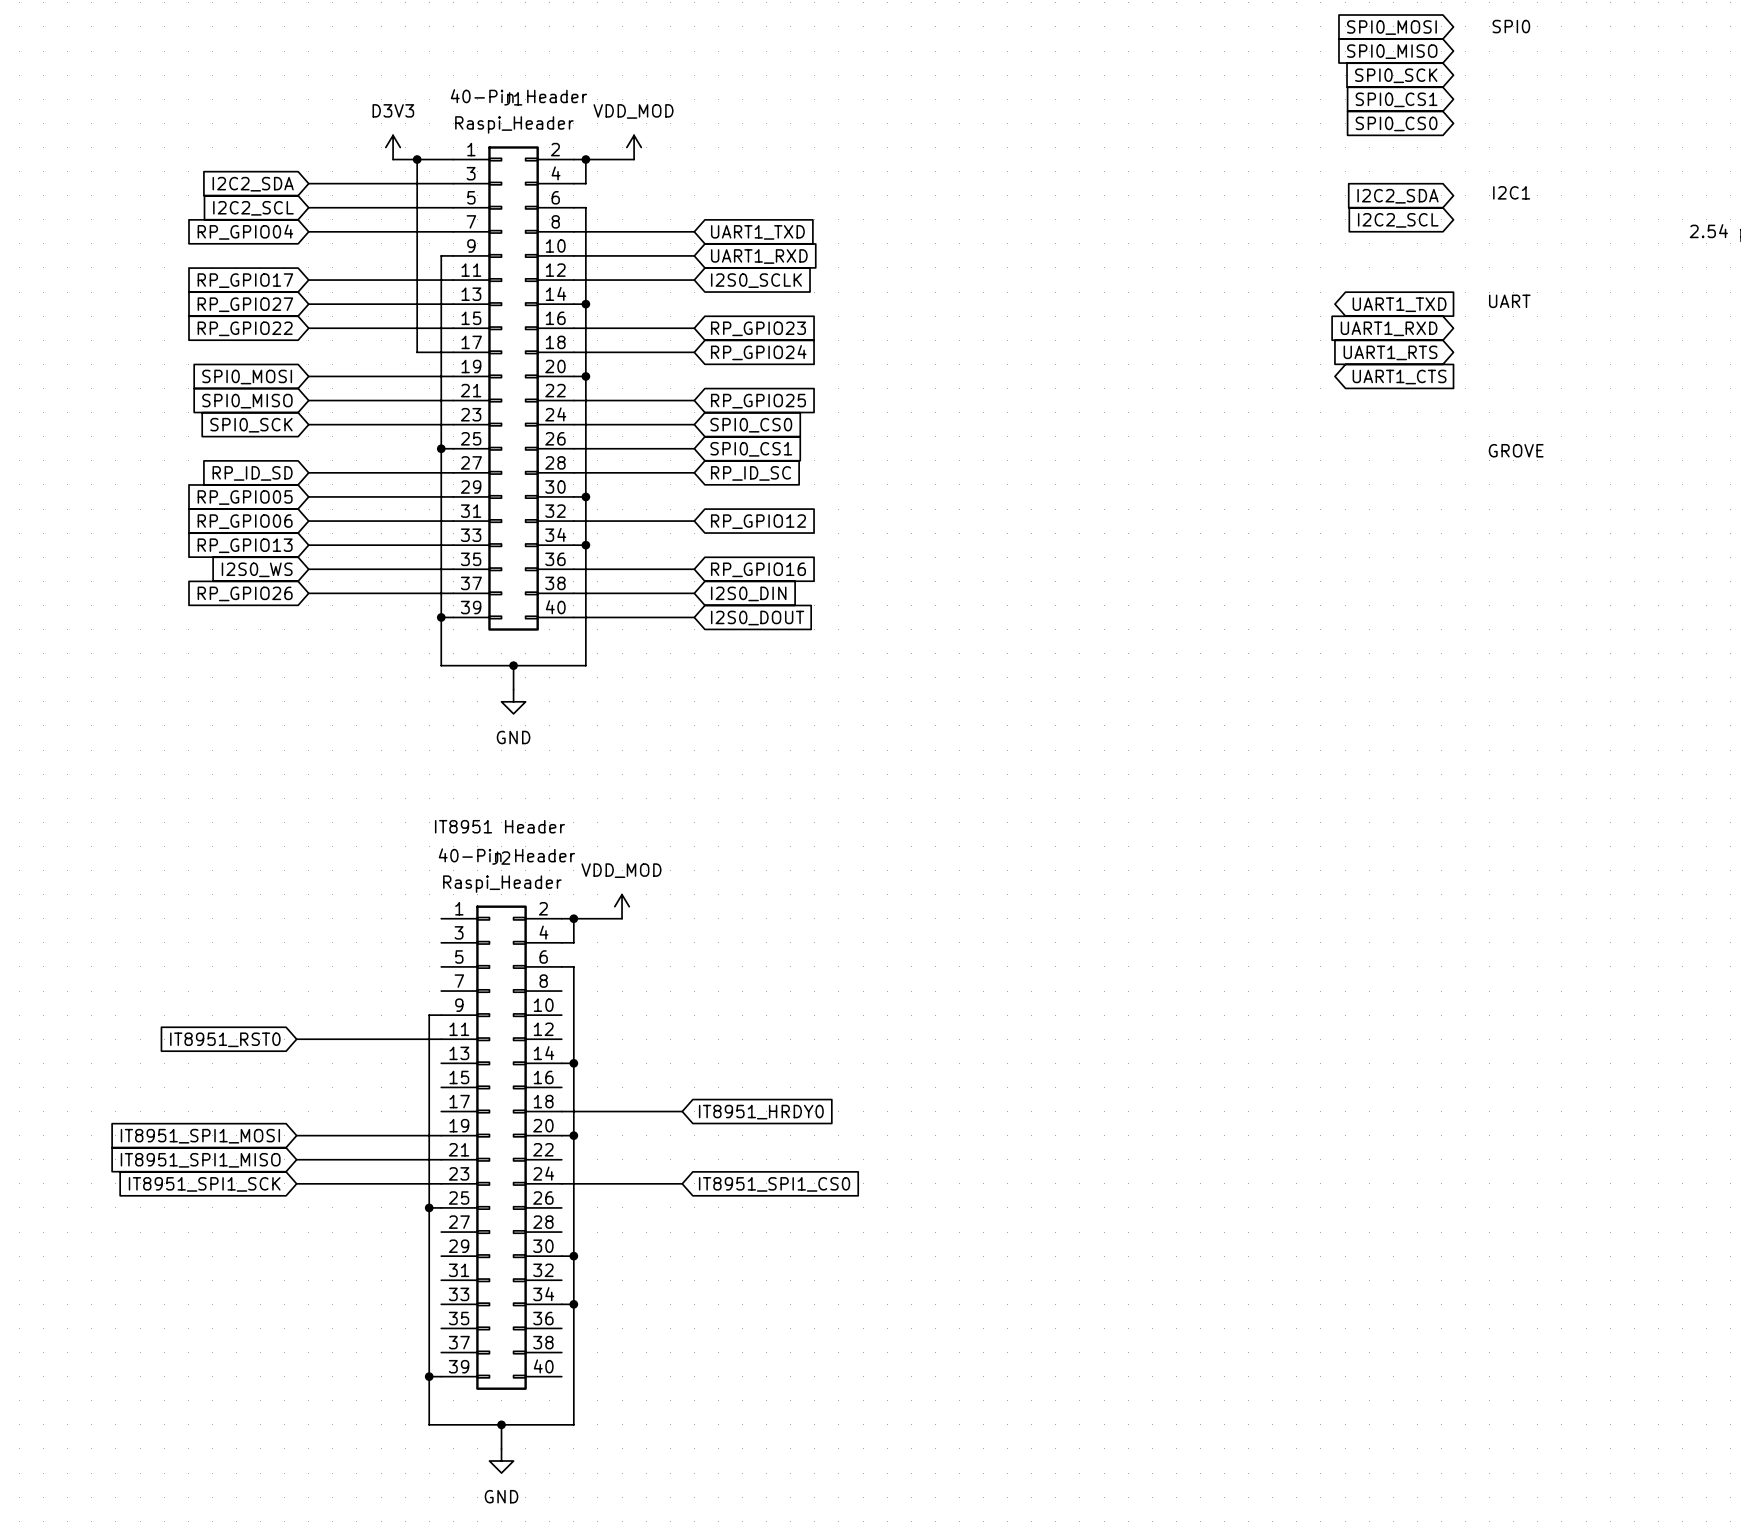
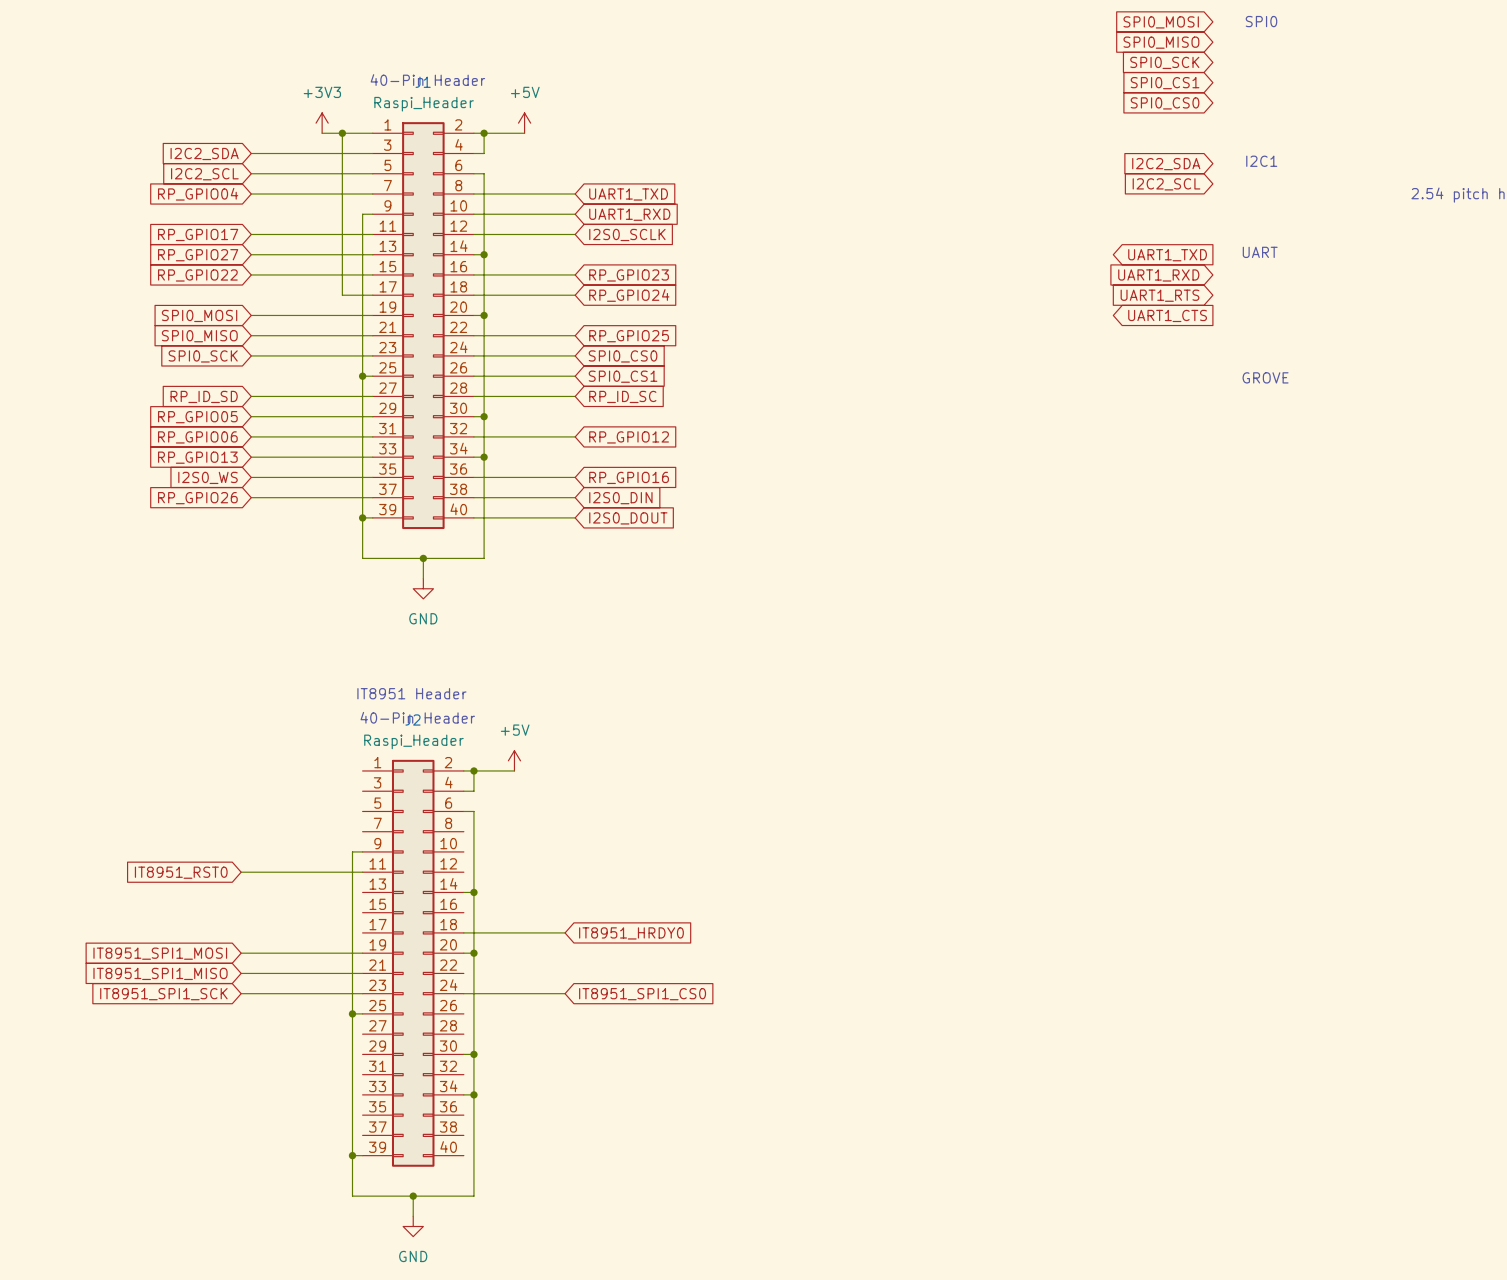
power symbol: D3V3 (393, 147) -> +3V3 (322, 123)
power symbol: VDD_MOD (634, 147) -> +5V (524, 123)
power symbol: VDD_MOD (622, 906) -> +5V (514, 760)

